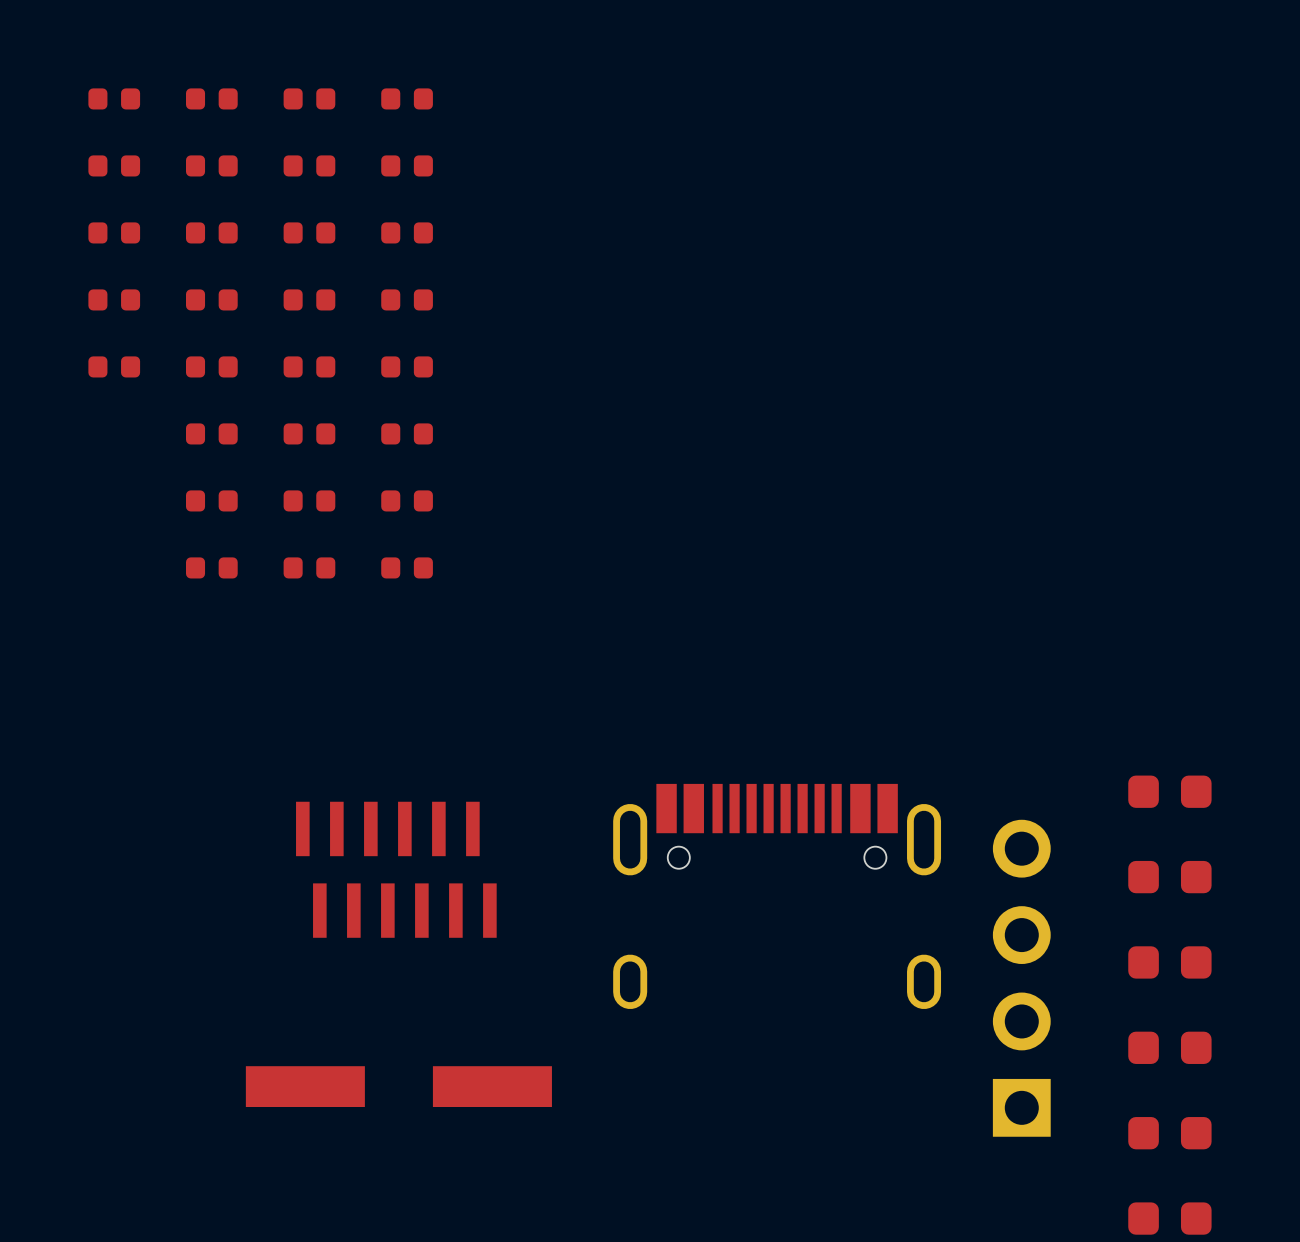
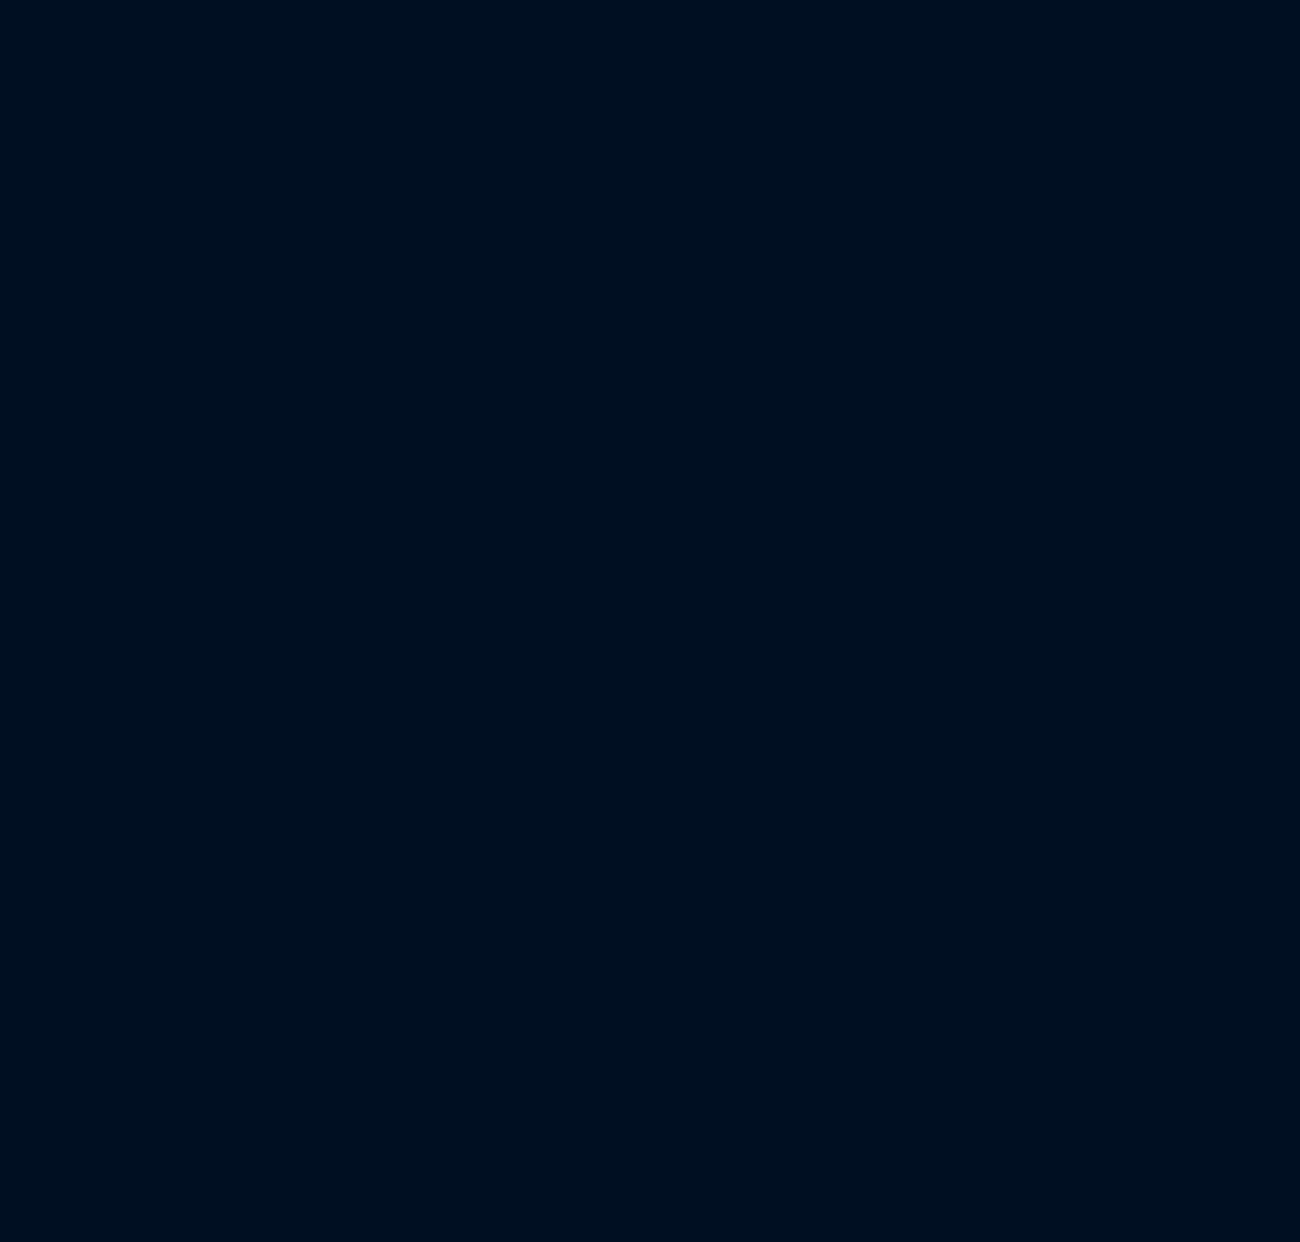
part: (114, 98) -> none
part: (211, 98) -> none
part: (309, 98) -> none
part: (407, 98) -> none
part: (114, 165) -> none
part: (211, 165) -> none
part: (309, 165) -> none
part: (407, 165) -> none
part: (114, 232) -> none
part: (211, 232) -> none
part: (309, 232) -> none
part: (407, 232) -> none
part: (114, 299) -> none
part: (211, 299) -> none
part: (309, 299) -> none
part: (407, 299) -> none
part: (114, 366) -> none
part: (211, 366) -> none
part: (309, 366) -> none
part: (407, 366) -> none
part: (211, 433) -> none
part: (309, 433) -> none
part: (407, 433) -> none
part: (211, 500) -> none
part: (309, 500) -> none
part: (407, 500) -> none
part: (211, 567) -> none
part: (309, 567) -> none
part: (407, 567) -> none
part: (1169, 791) -> none
part: (396, 869) -> none
part: (1169, 877) -> none
part: (777, 896) -> none
part: (1169, 962) -> none
part: (1021, 978) -> none
part: (1169, 1047) -> none
part: (398, 1086) -> none
part: (1169, 1133) -> none
part: (1169, 1218) -> none

